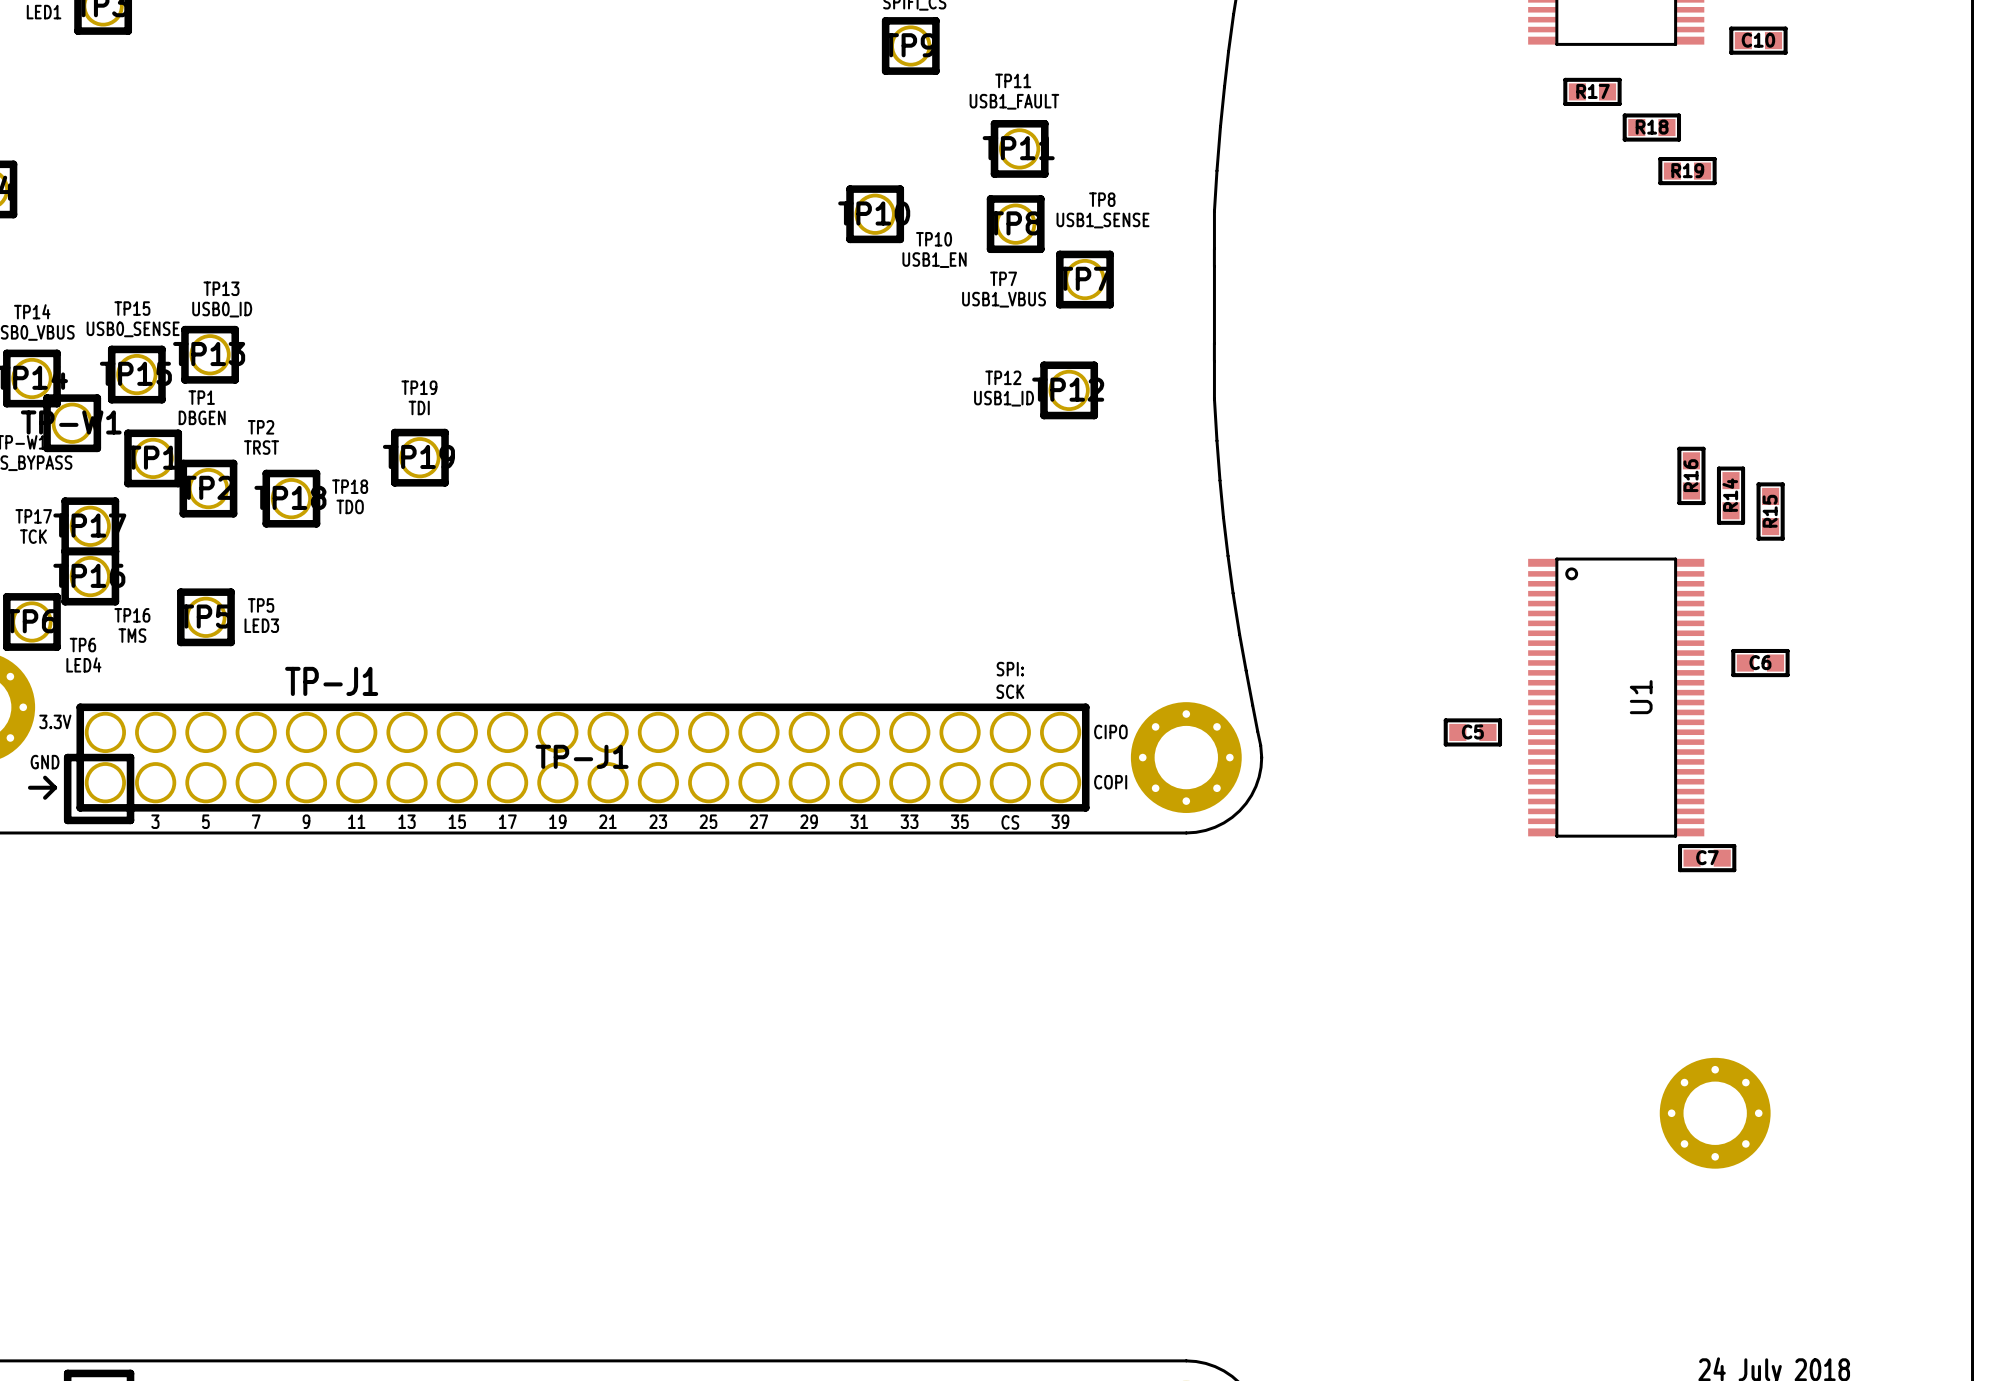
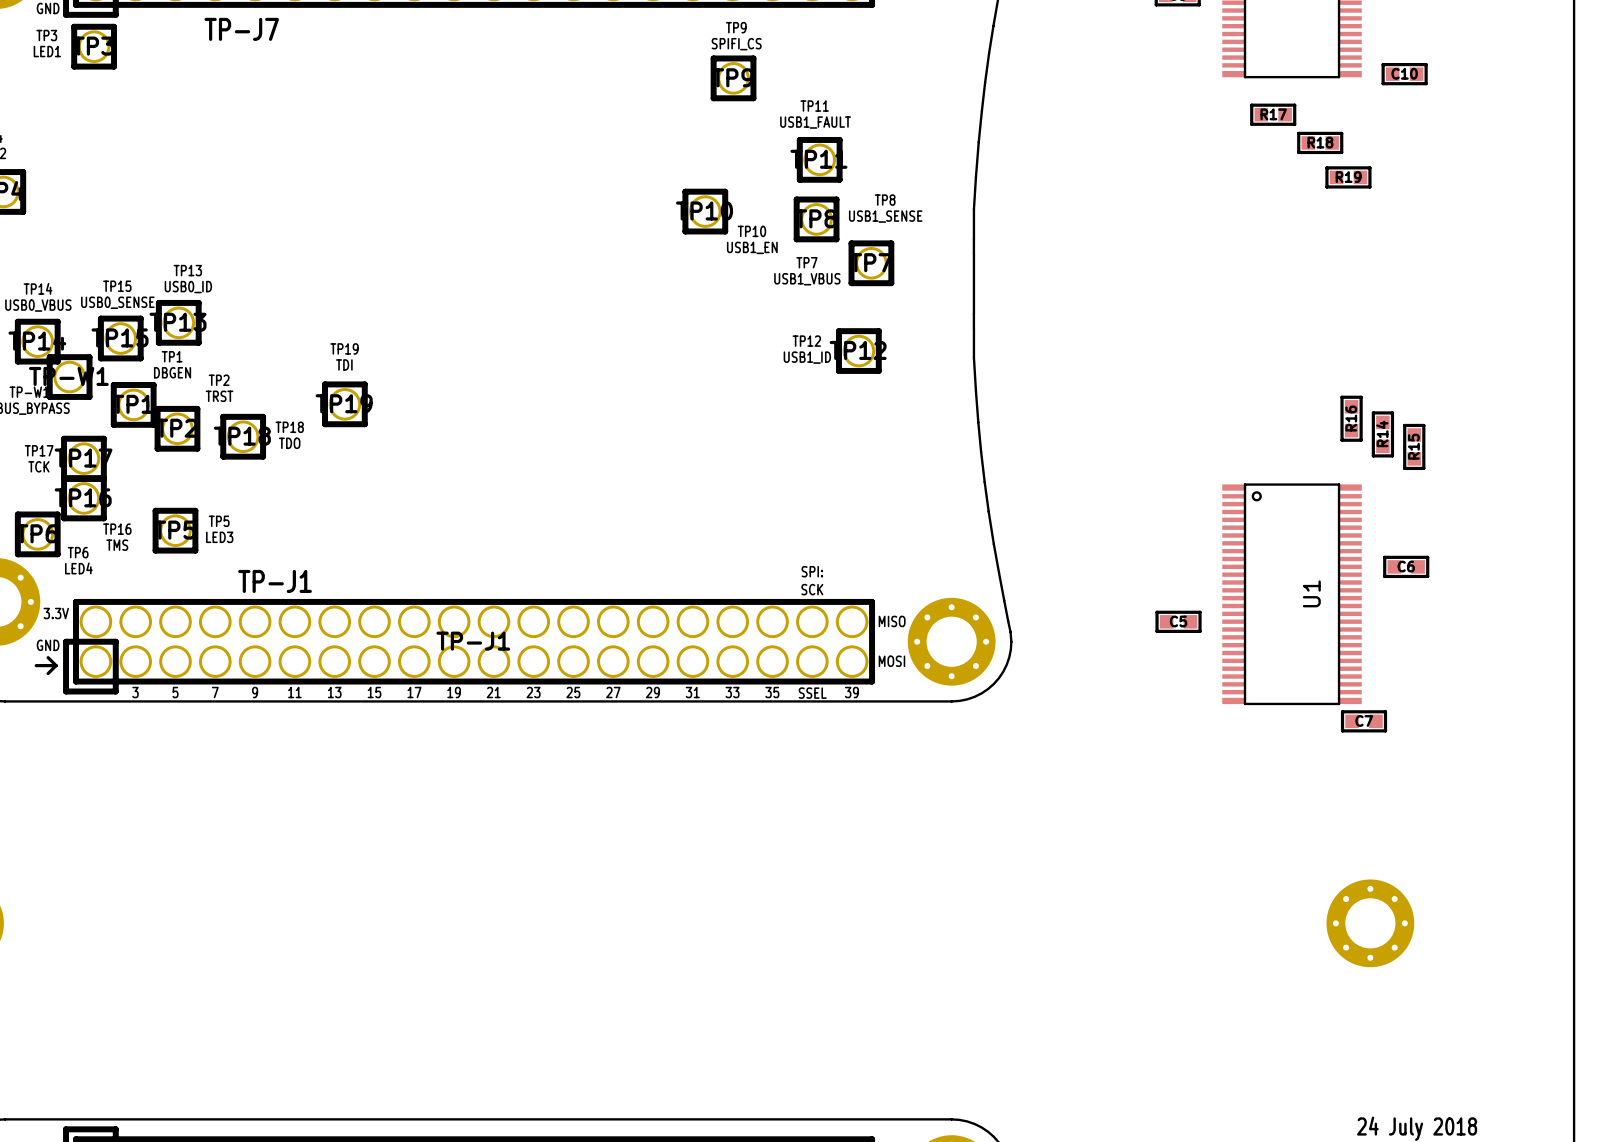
text: CIPO (1110, 731) -> MISO (892, 621)
text: COPI (1110, 782) -> MOSI (891, 661)
text: CS (1010, 822) -> SSEL (812, 693)

